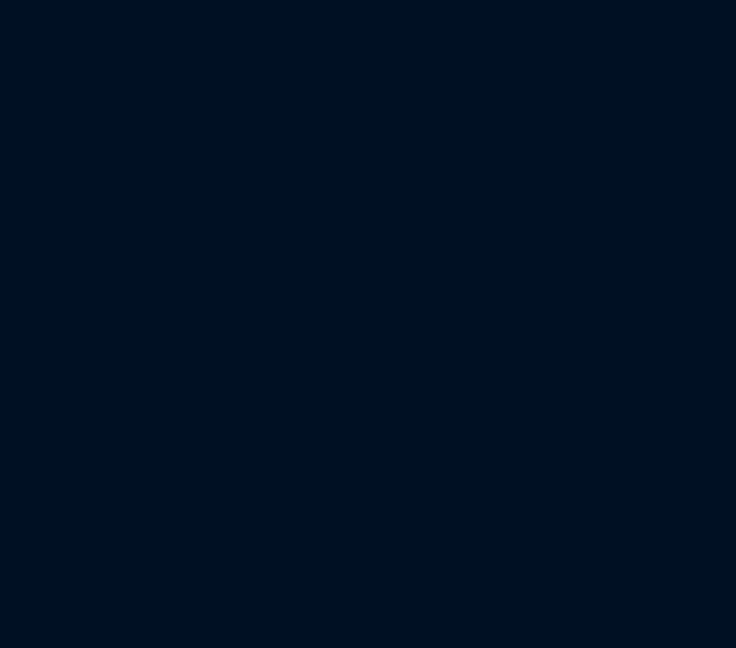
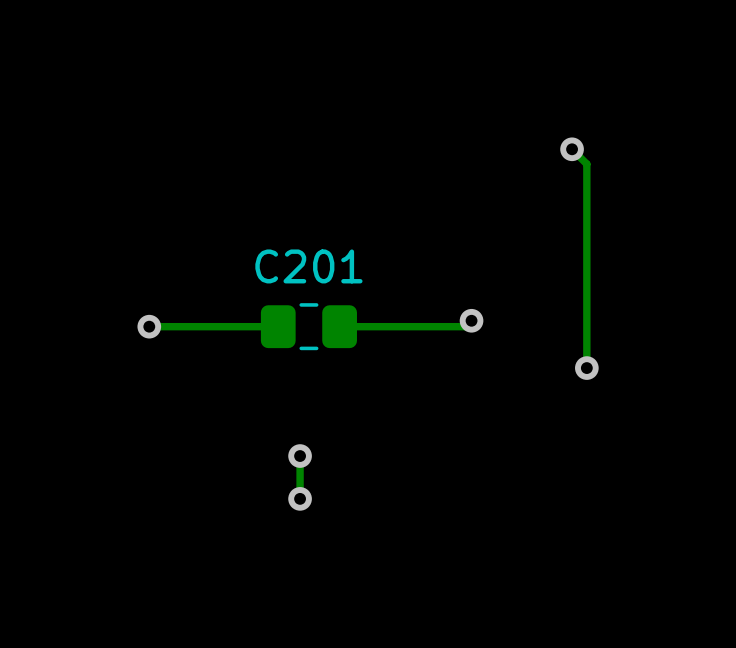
track: none -> (572, 149) (586, 164) (586, 368)
via: none -> (572, 149)
track: none -> (471, 320) (465, 326) (339, 326)
via: none -> (471, 320)
via: none -> (149, 326)
track: none -> (278, 326) (149, 326)
C201: none -> (308, 326)
via: none -> (586, 368)
track: none -> (300, 456) (300, 498)
via: none -> (300, 456)
via: none -> (300, 498)

